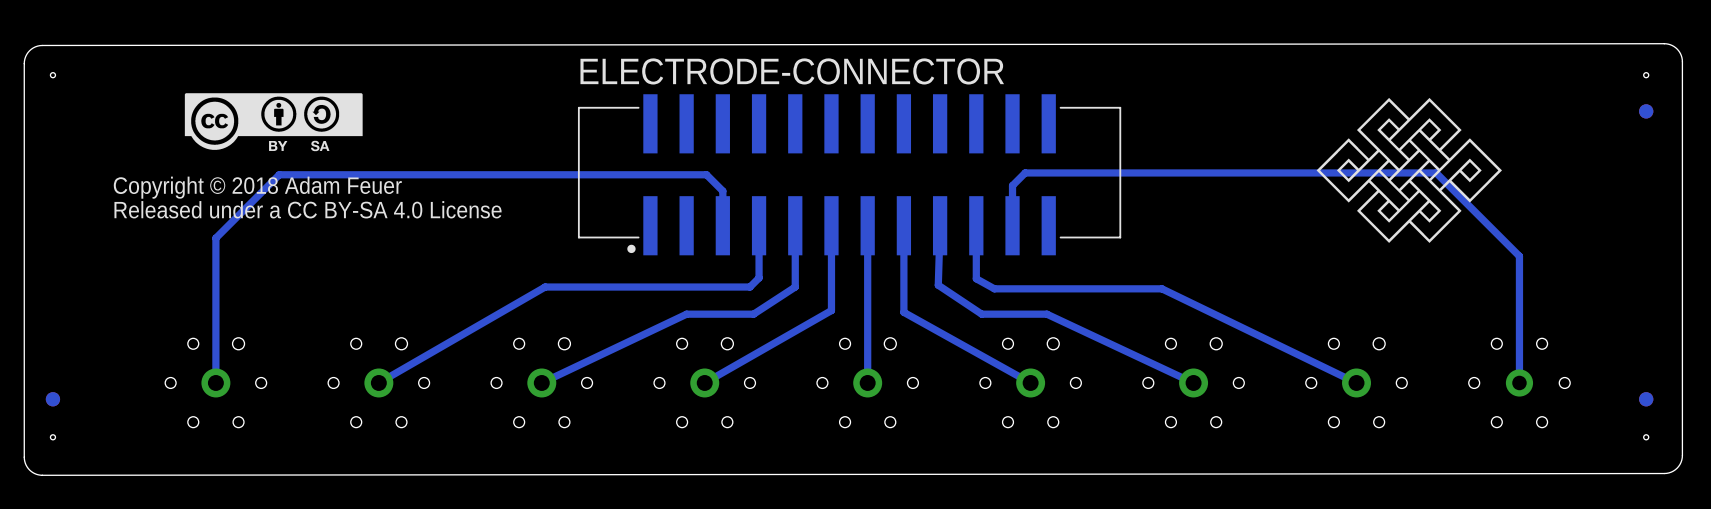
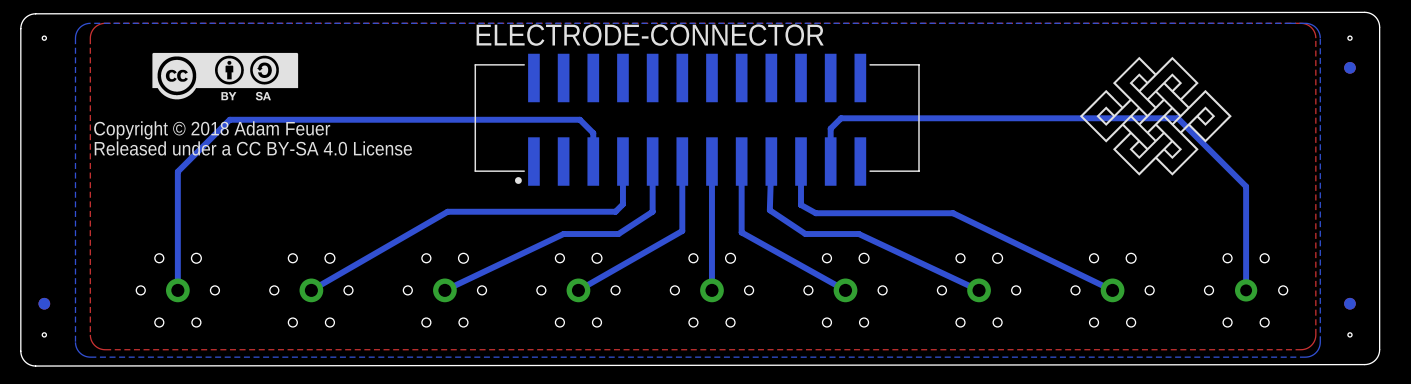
top zone outline: none -> (1301, 23) (1311, 27) (1315, 38) (1315, 334) (1312, 343) (1304, 349) (105, 349) (96, 346) (90, 338) (90, 38) (93, 29) (101, 23) (1301, 23)
bottom zone outline: none -> (1305, 23) (86, 23) (78, 29) (75, 38) (75, 346) (81, 354) (90, 357) (1309, 356) (1317, 351) (1320, 342) (1320, 38) (1315, 27) (1305, 23)

